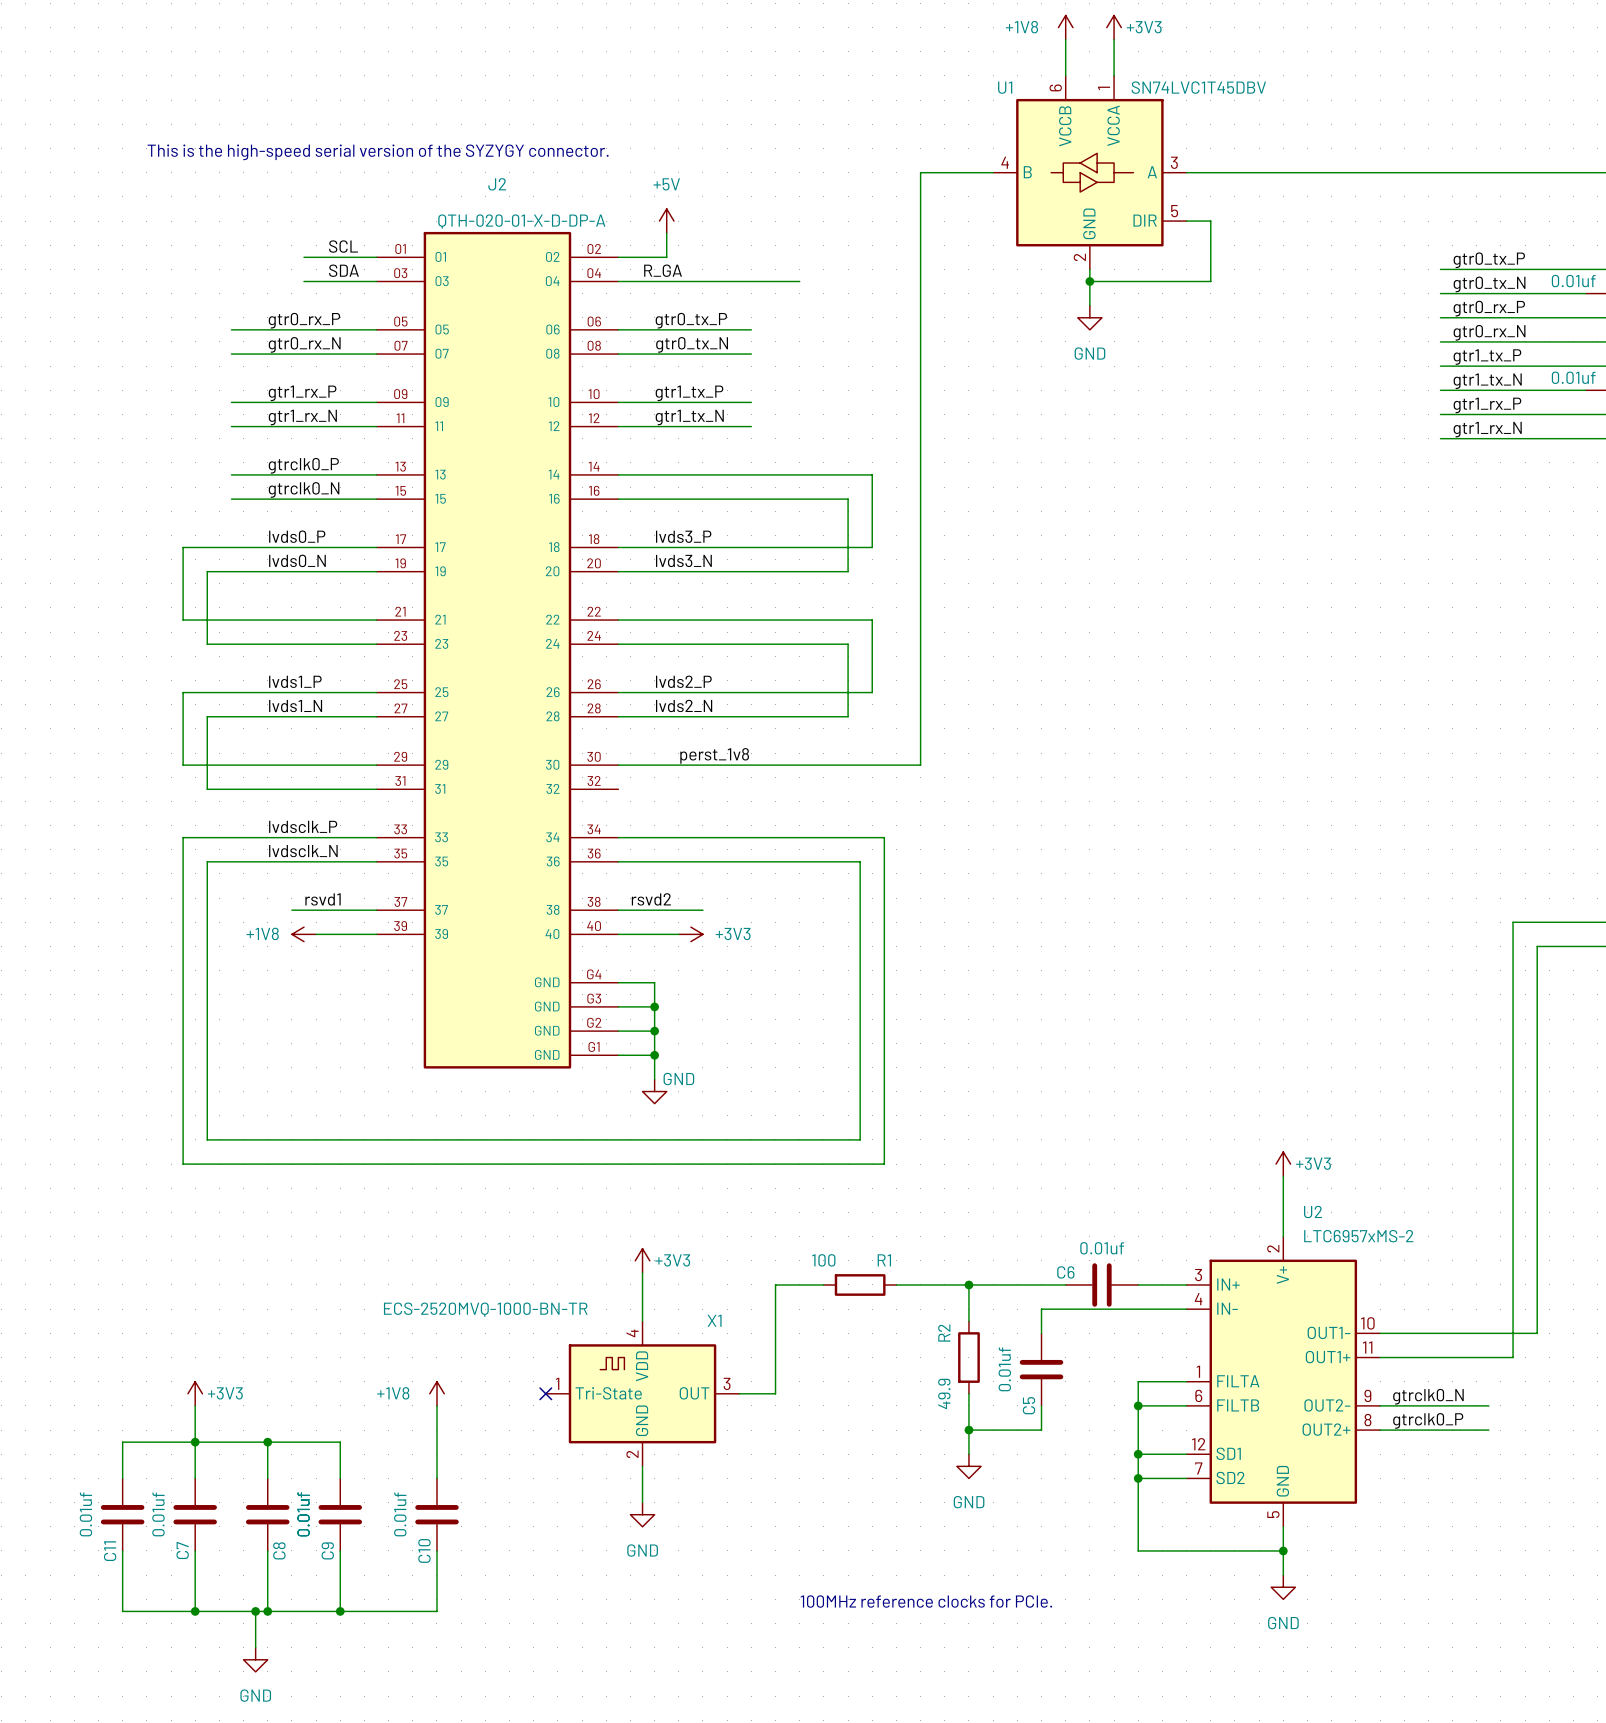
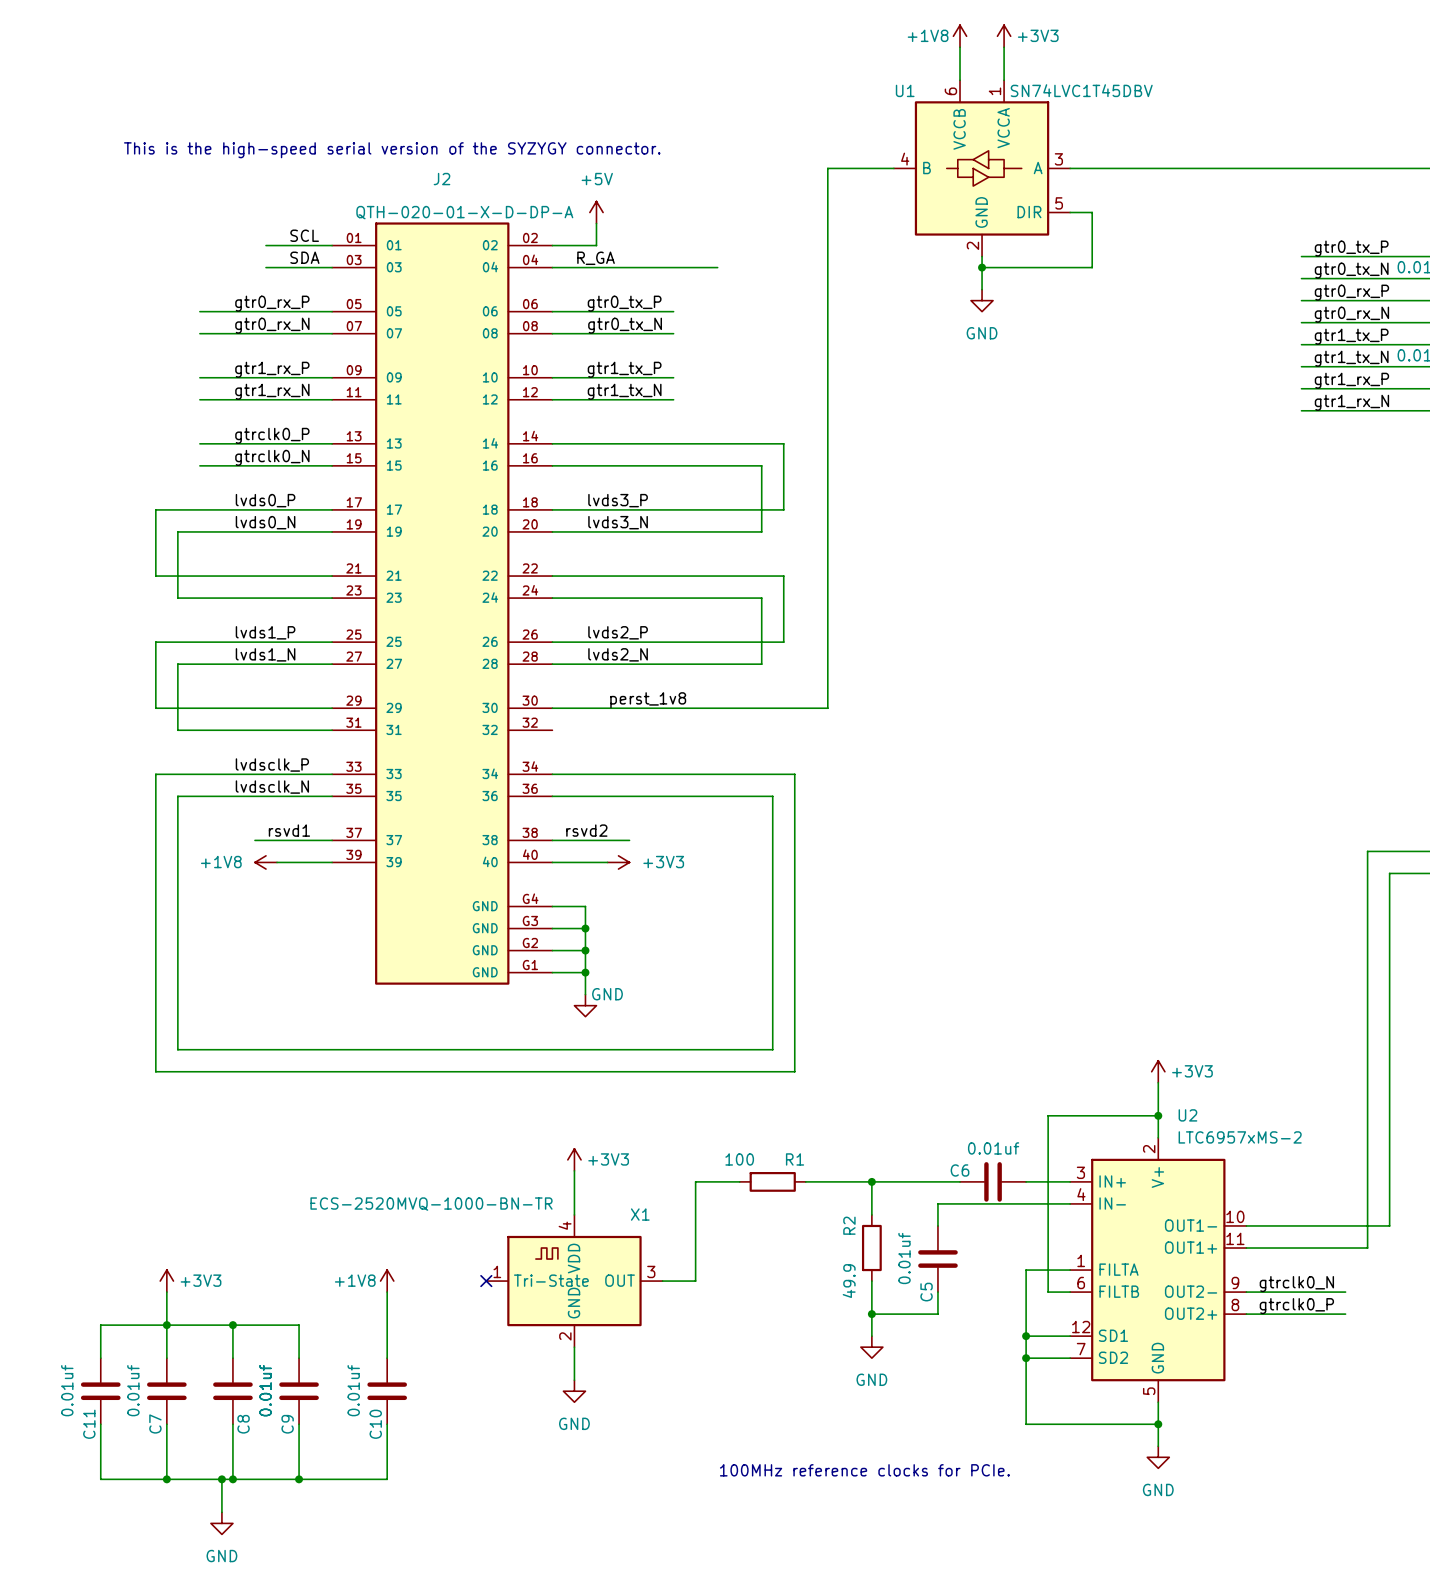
junction: none -> (1158, 1115)
wire: (1138, 1405) (1162, 1405) -> (1158, 1115) (1048, 1115) (1048, 1292)
junction: (1138, 1405) -> none

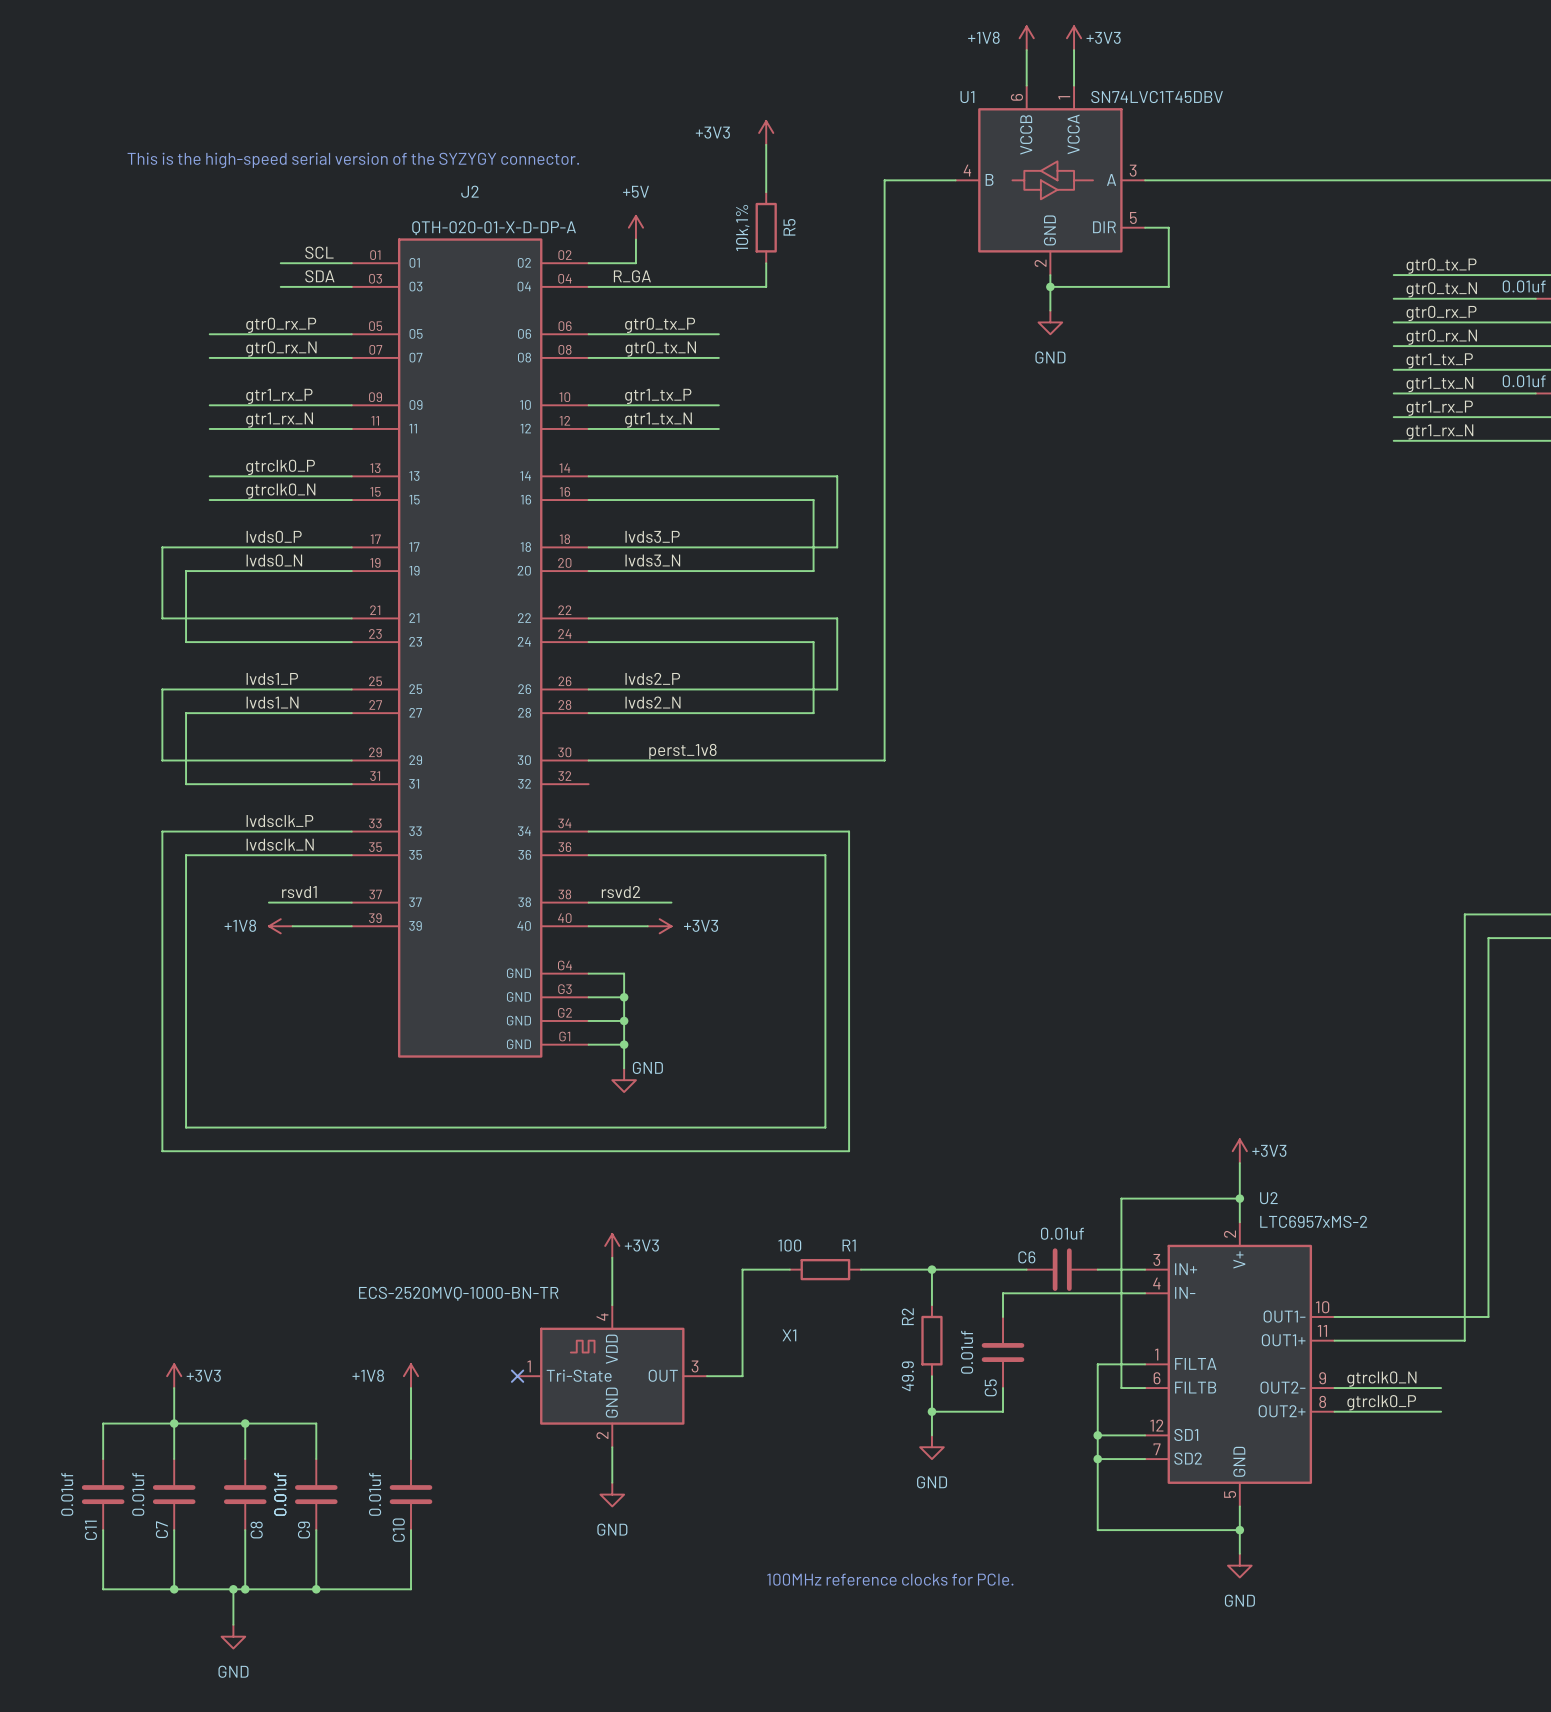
power symbol: none -> +3V3 (766, 132)
wire: none -> (766, 144) (766, 192)
R5: none -> 10k,1% (766, 227)
wire: none -> (766, 263) (766, 286)
X1 name position: X1 (640, 1214) -> X1 (789, 1335)

